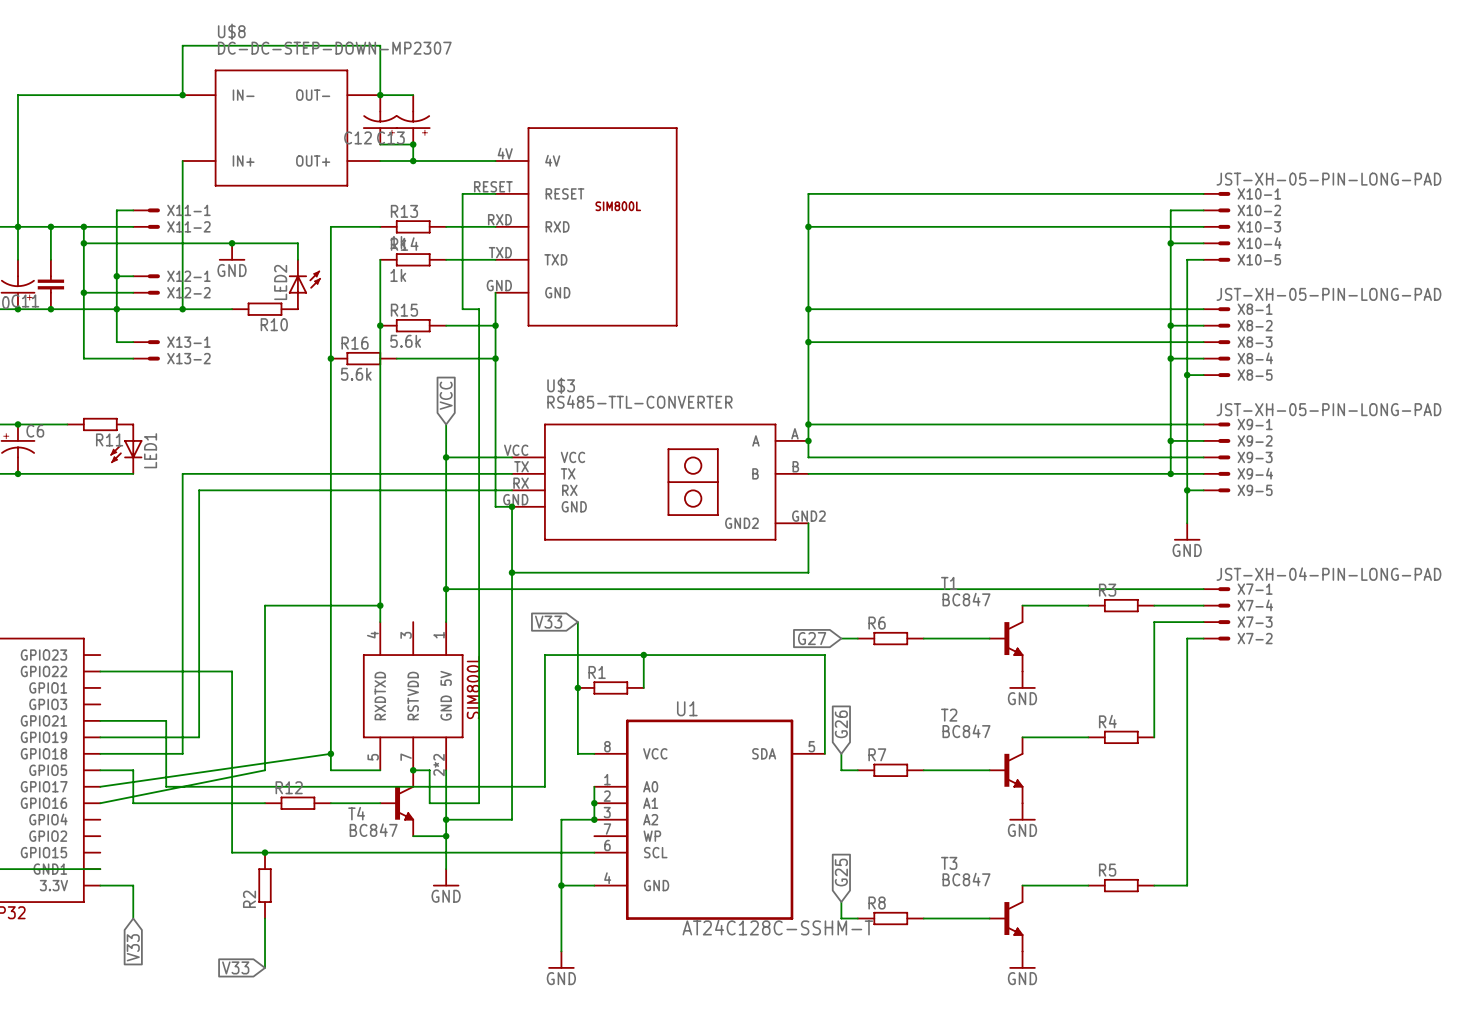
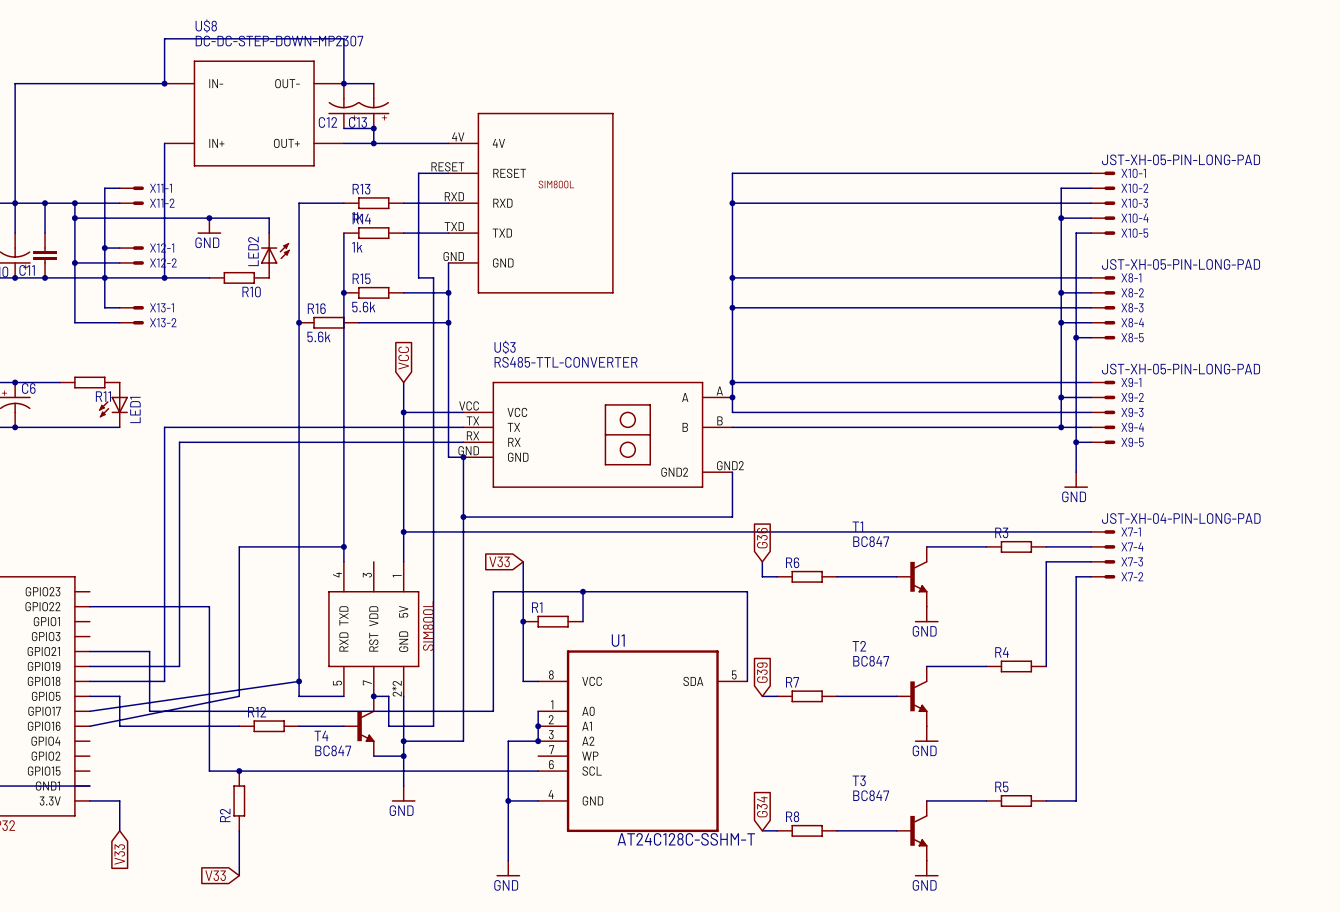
global label: none -> G36 (762, 538)
global label: G27 (812, 638) -> none
global label: G26 (841, 724) -> none
global label: none -> G39 (762, 672)
wire: (841, 753) (841, 770) -> (762, 561) (762, 576)
global label: G25 (841, 872) -> none
global label: none -> G34 (762, 806)
wire: (841, 902) (841, 918) -> none

